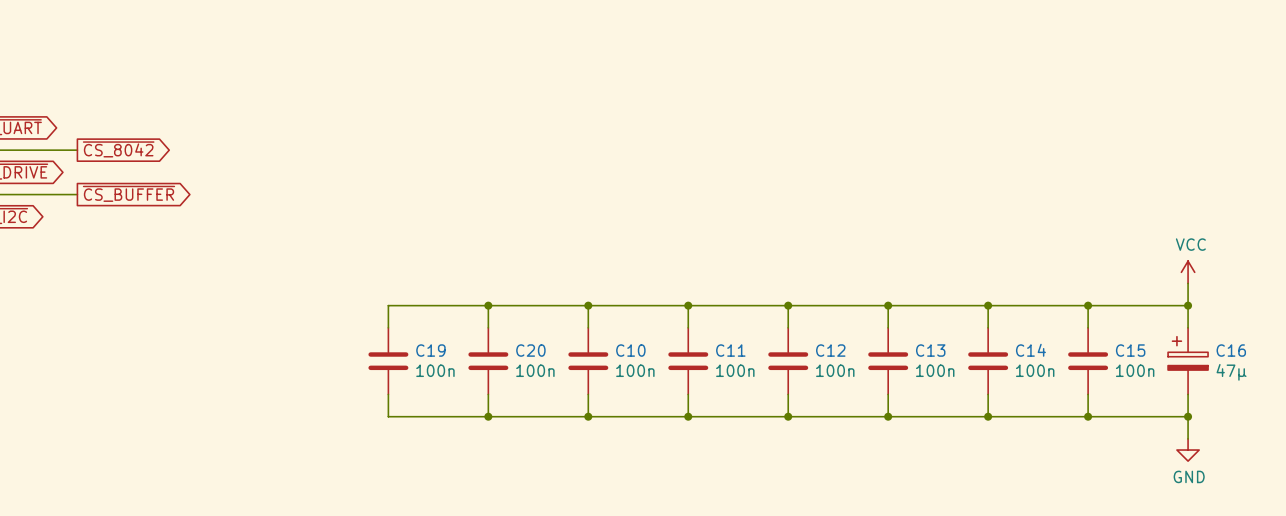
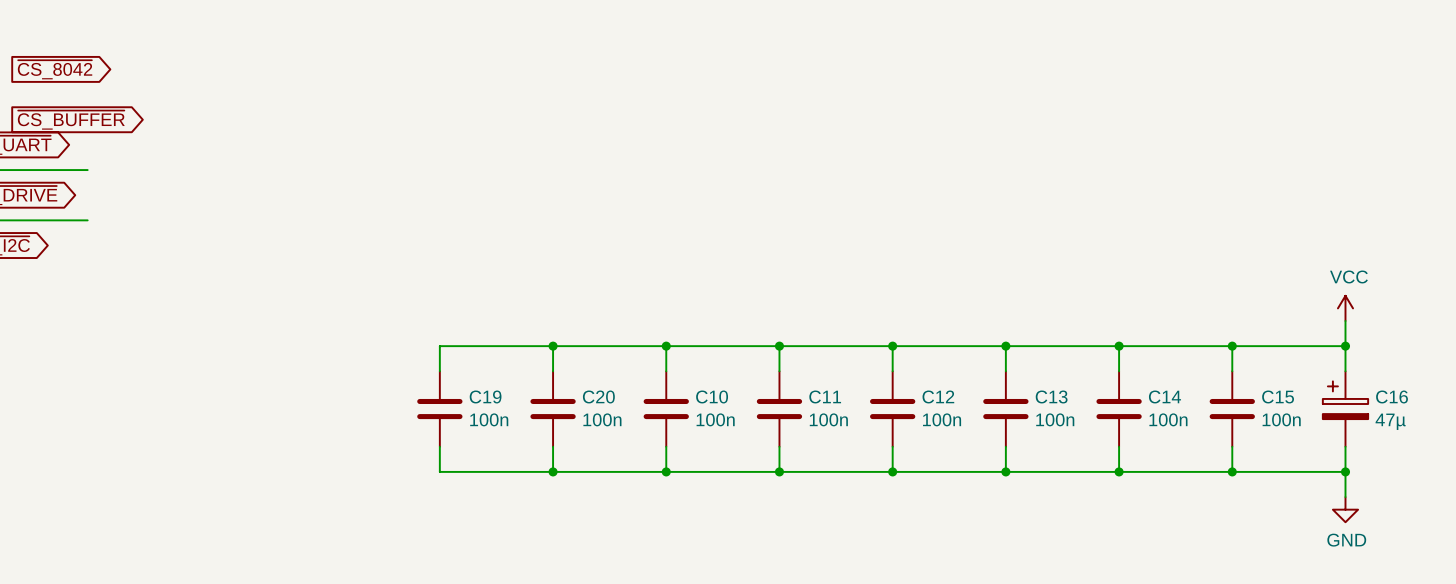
global label position: ~{CS_8042} (118, 149) -> ~{CS_8042} (55, 69)
global label position: ~{CS_BUFFER} (128, 193) -> ~{CS_BUFFER} (71, 120)

